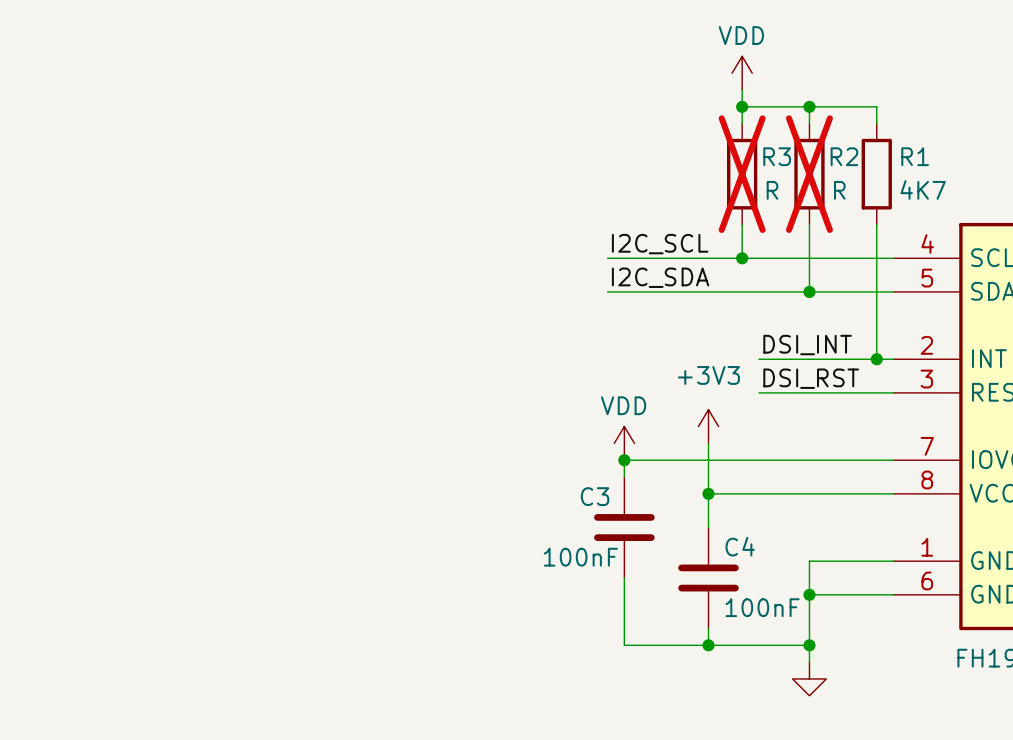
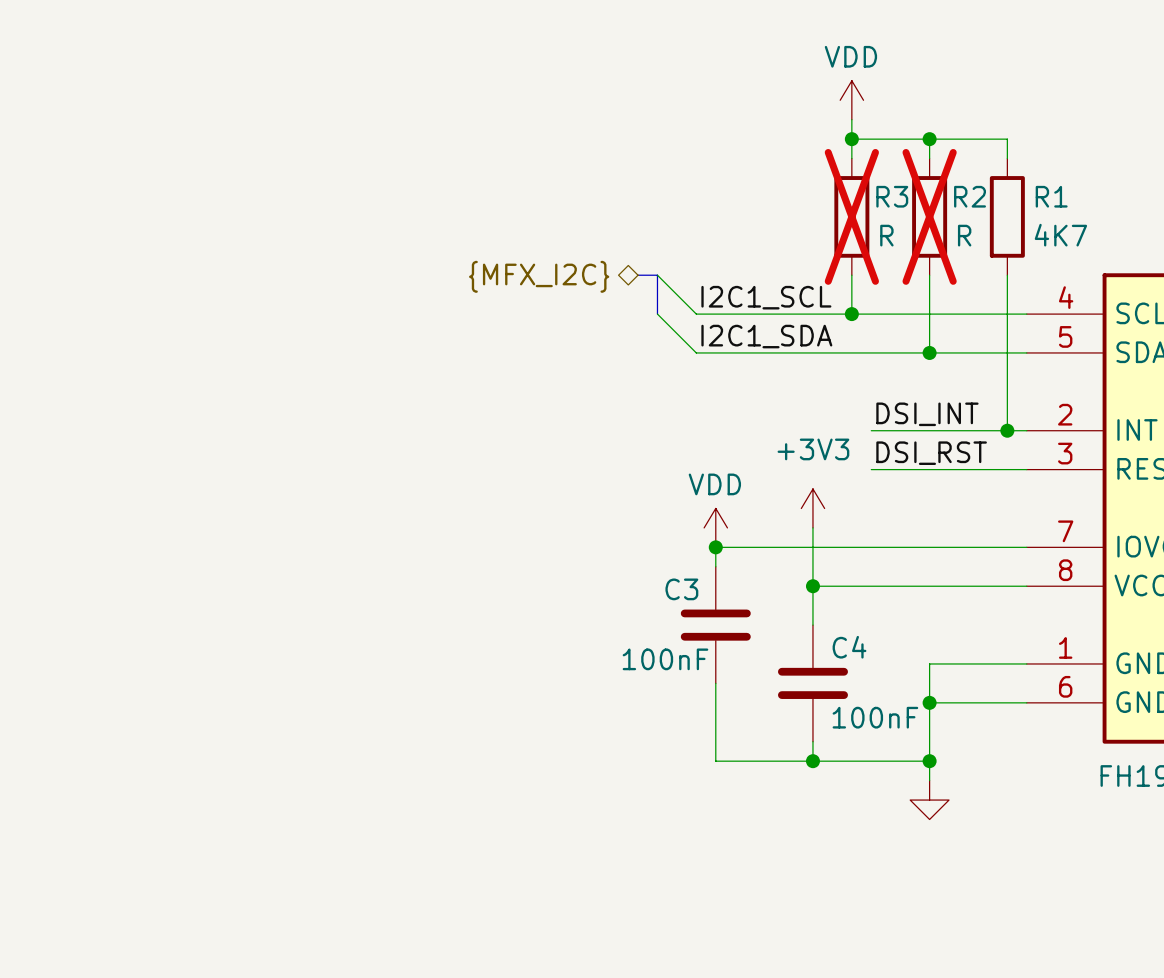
bus: none -> (638, 275) (657, 275) (657, 314)
wire: none -> (657, 275) (696, 314)
hierarchical label: none -> {MFX_I2C} (539, 276)
label: I2C_SCL (660, 244) -> I2C1_SCL (766, 297)
wire: none -> (657, 314) (696, 352)
label: I2C_SDA (660, 277) -> I2C1_SDA (766, 336)

